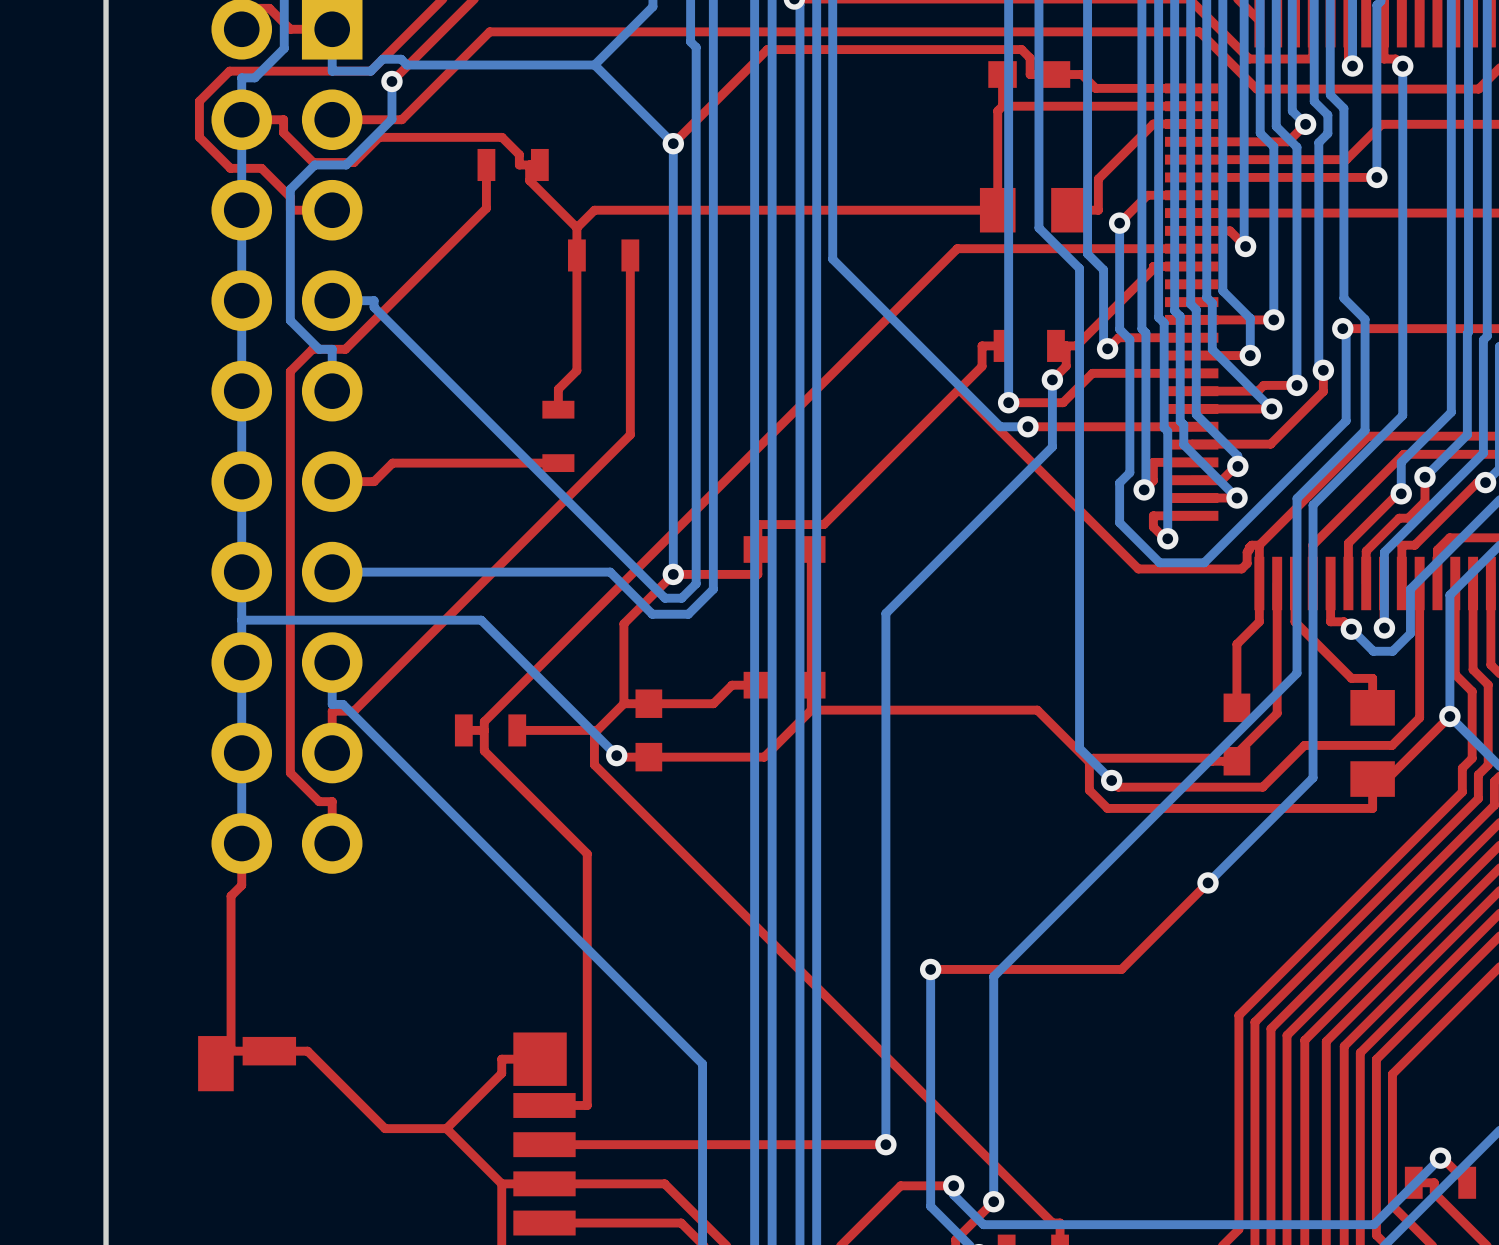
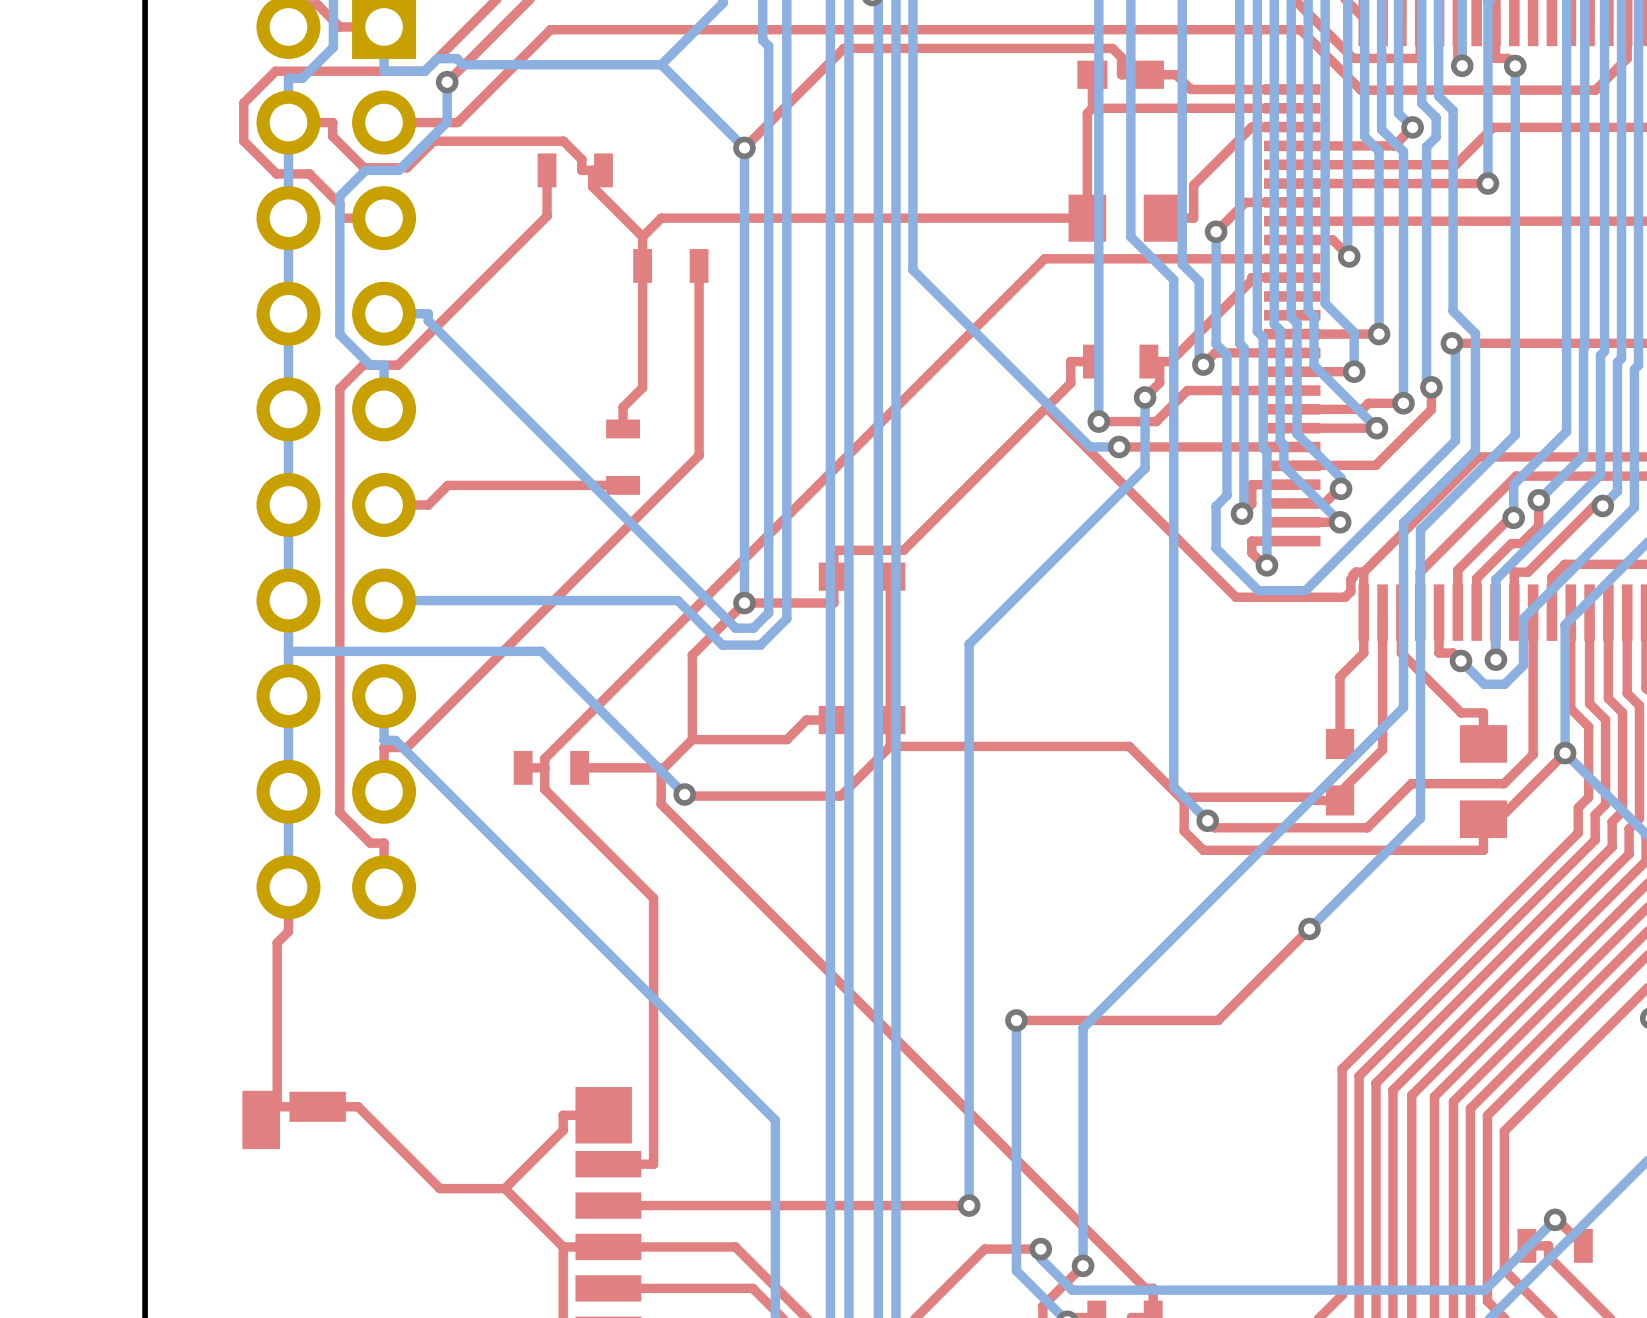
part: (648, 730) -> none

